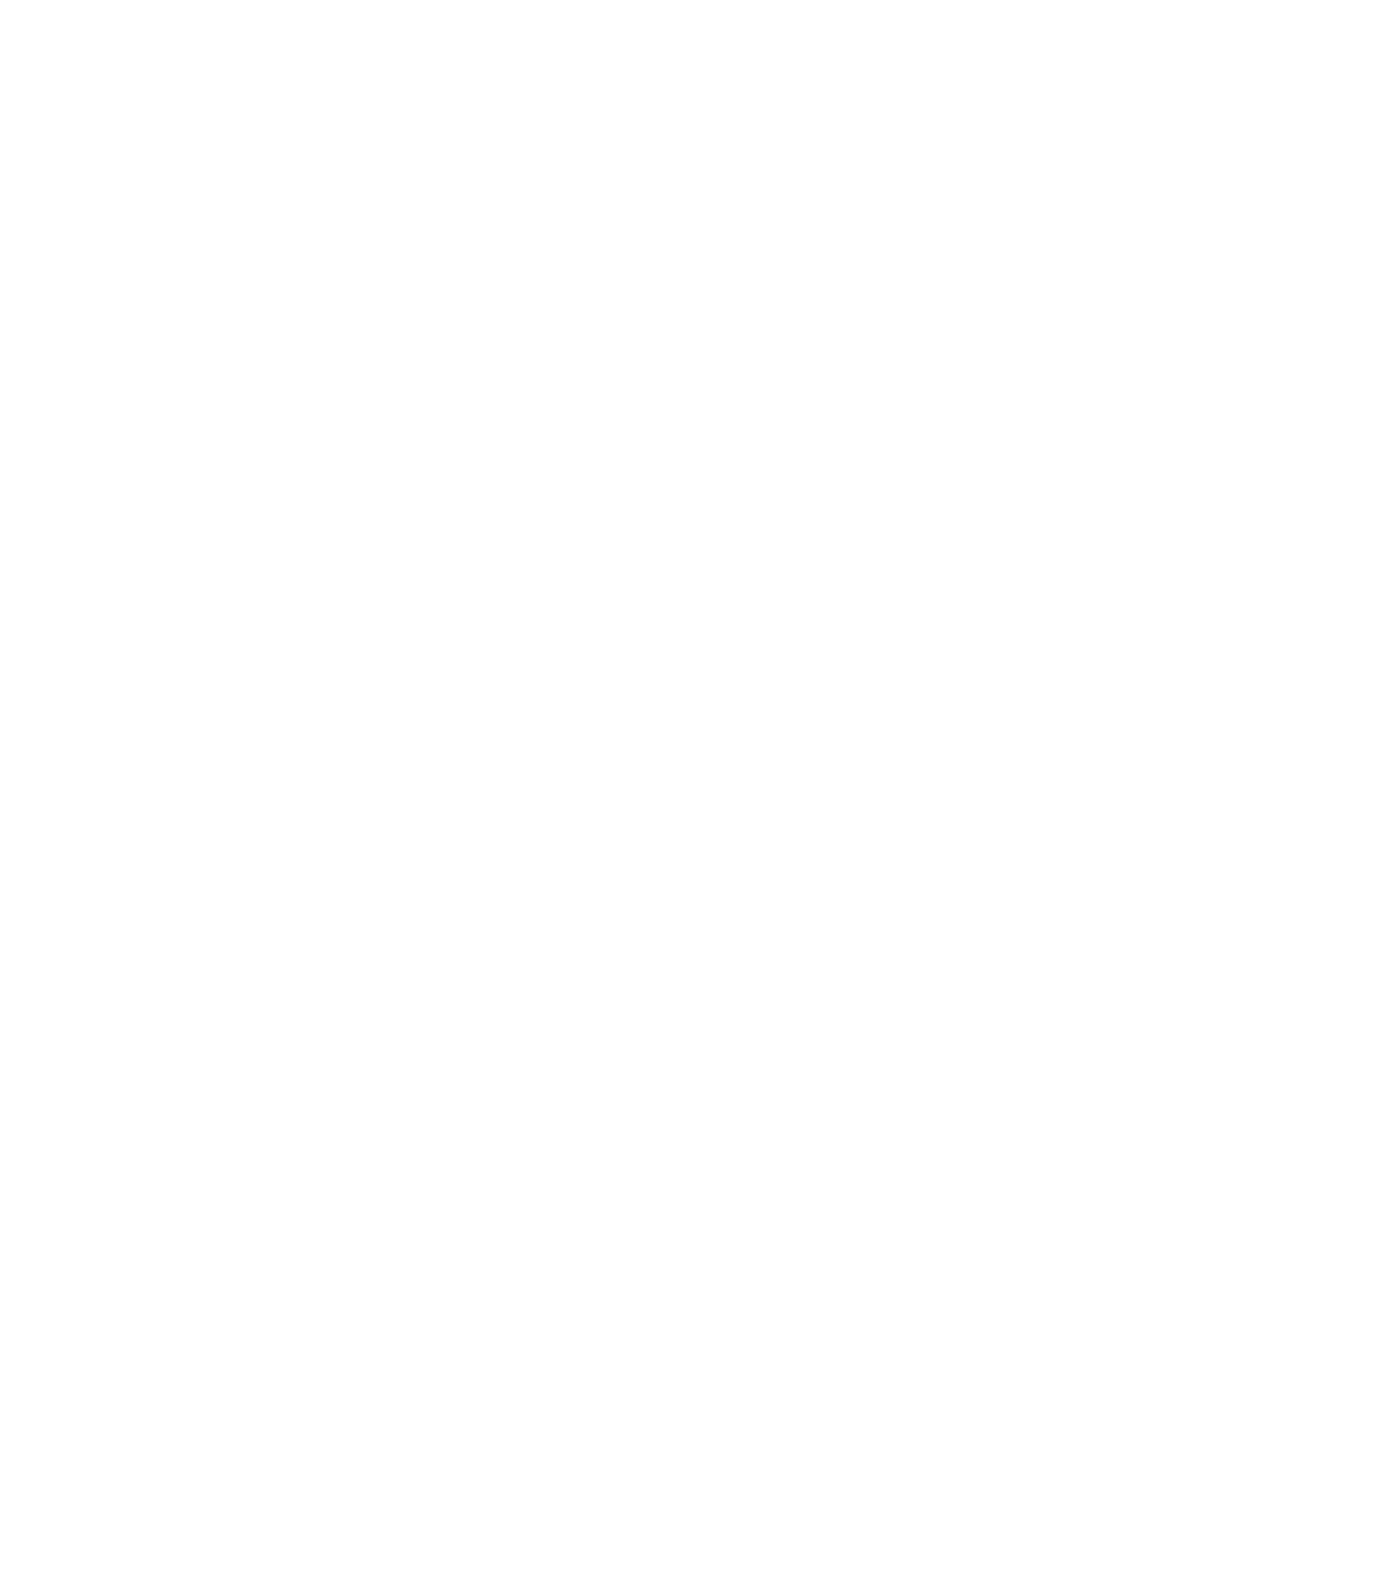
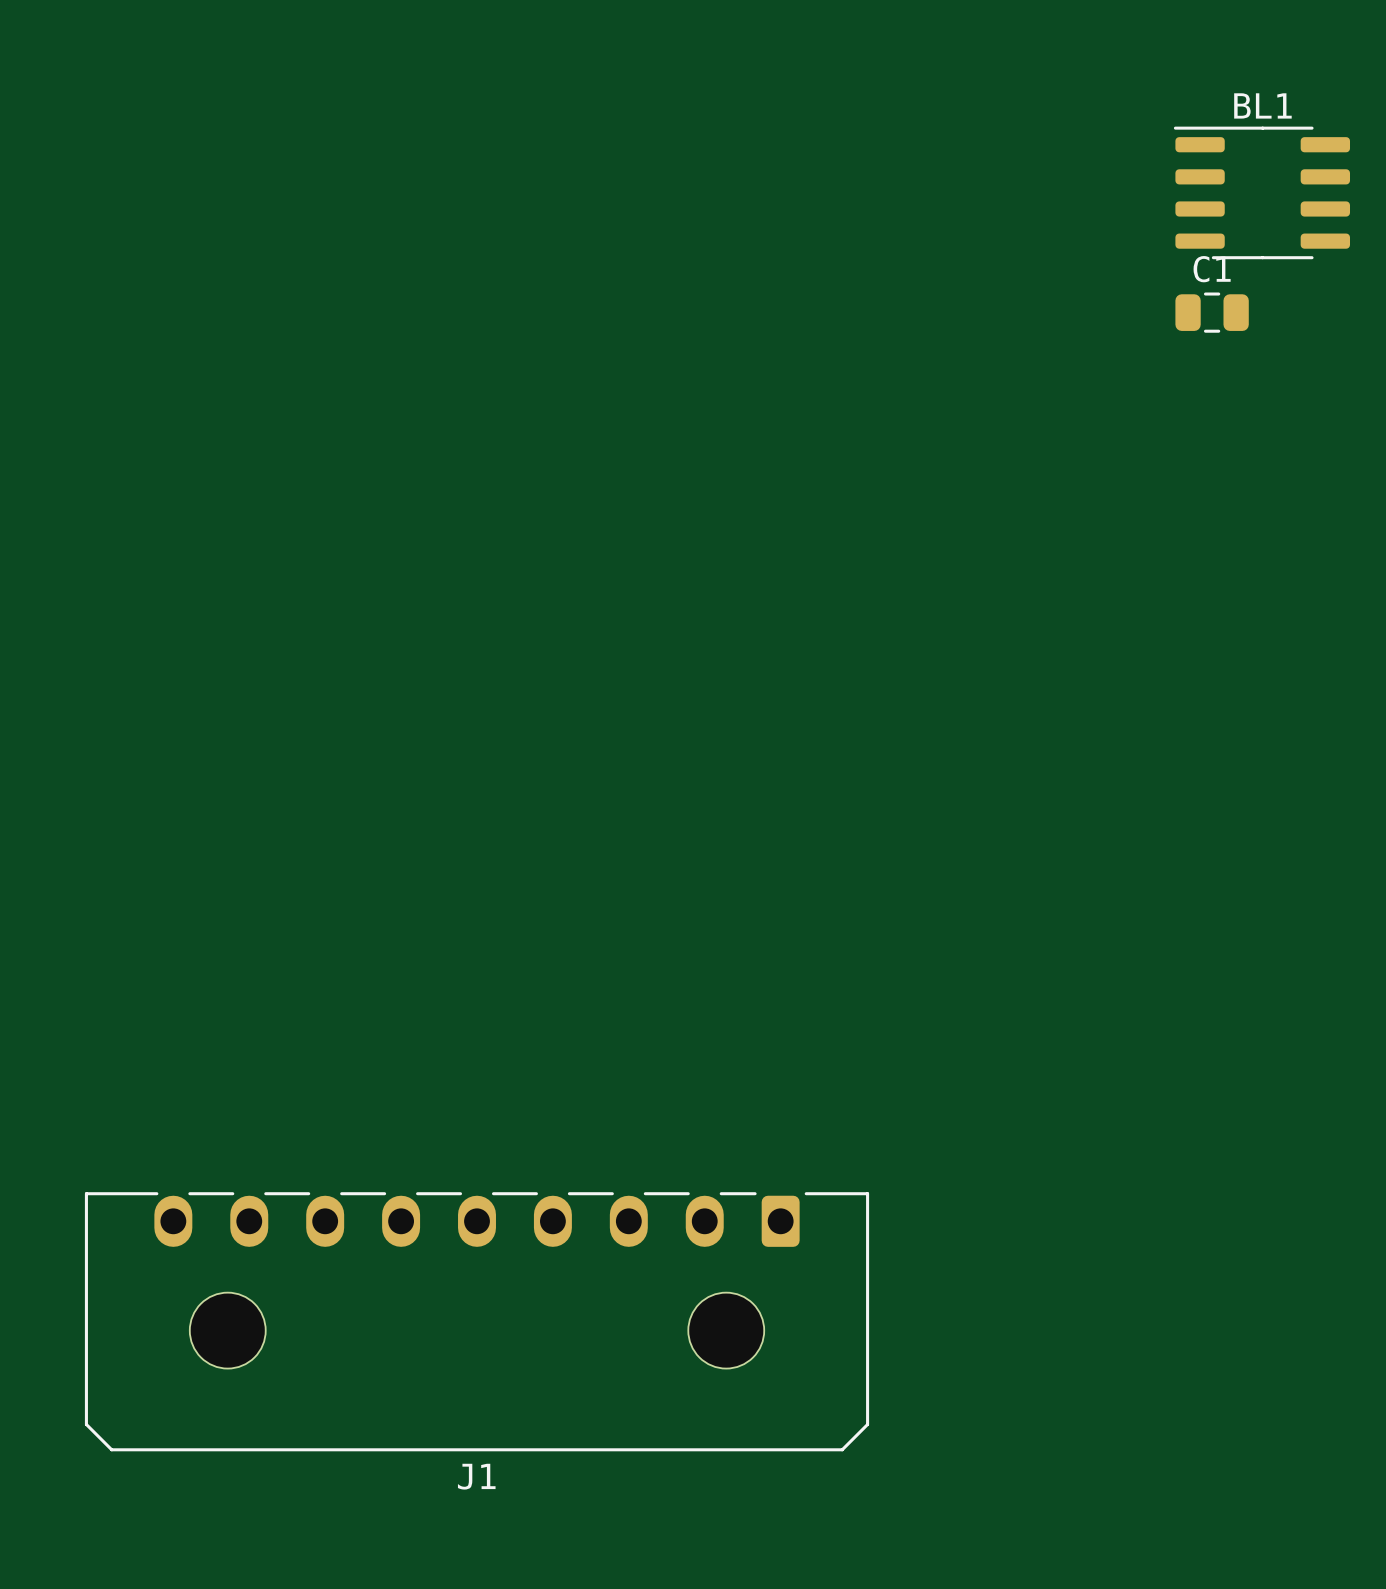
BL1: none -> (1261, 192)
C1: none -> (1212, 312)
J1: none -> (477, 1321)

